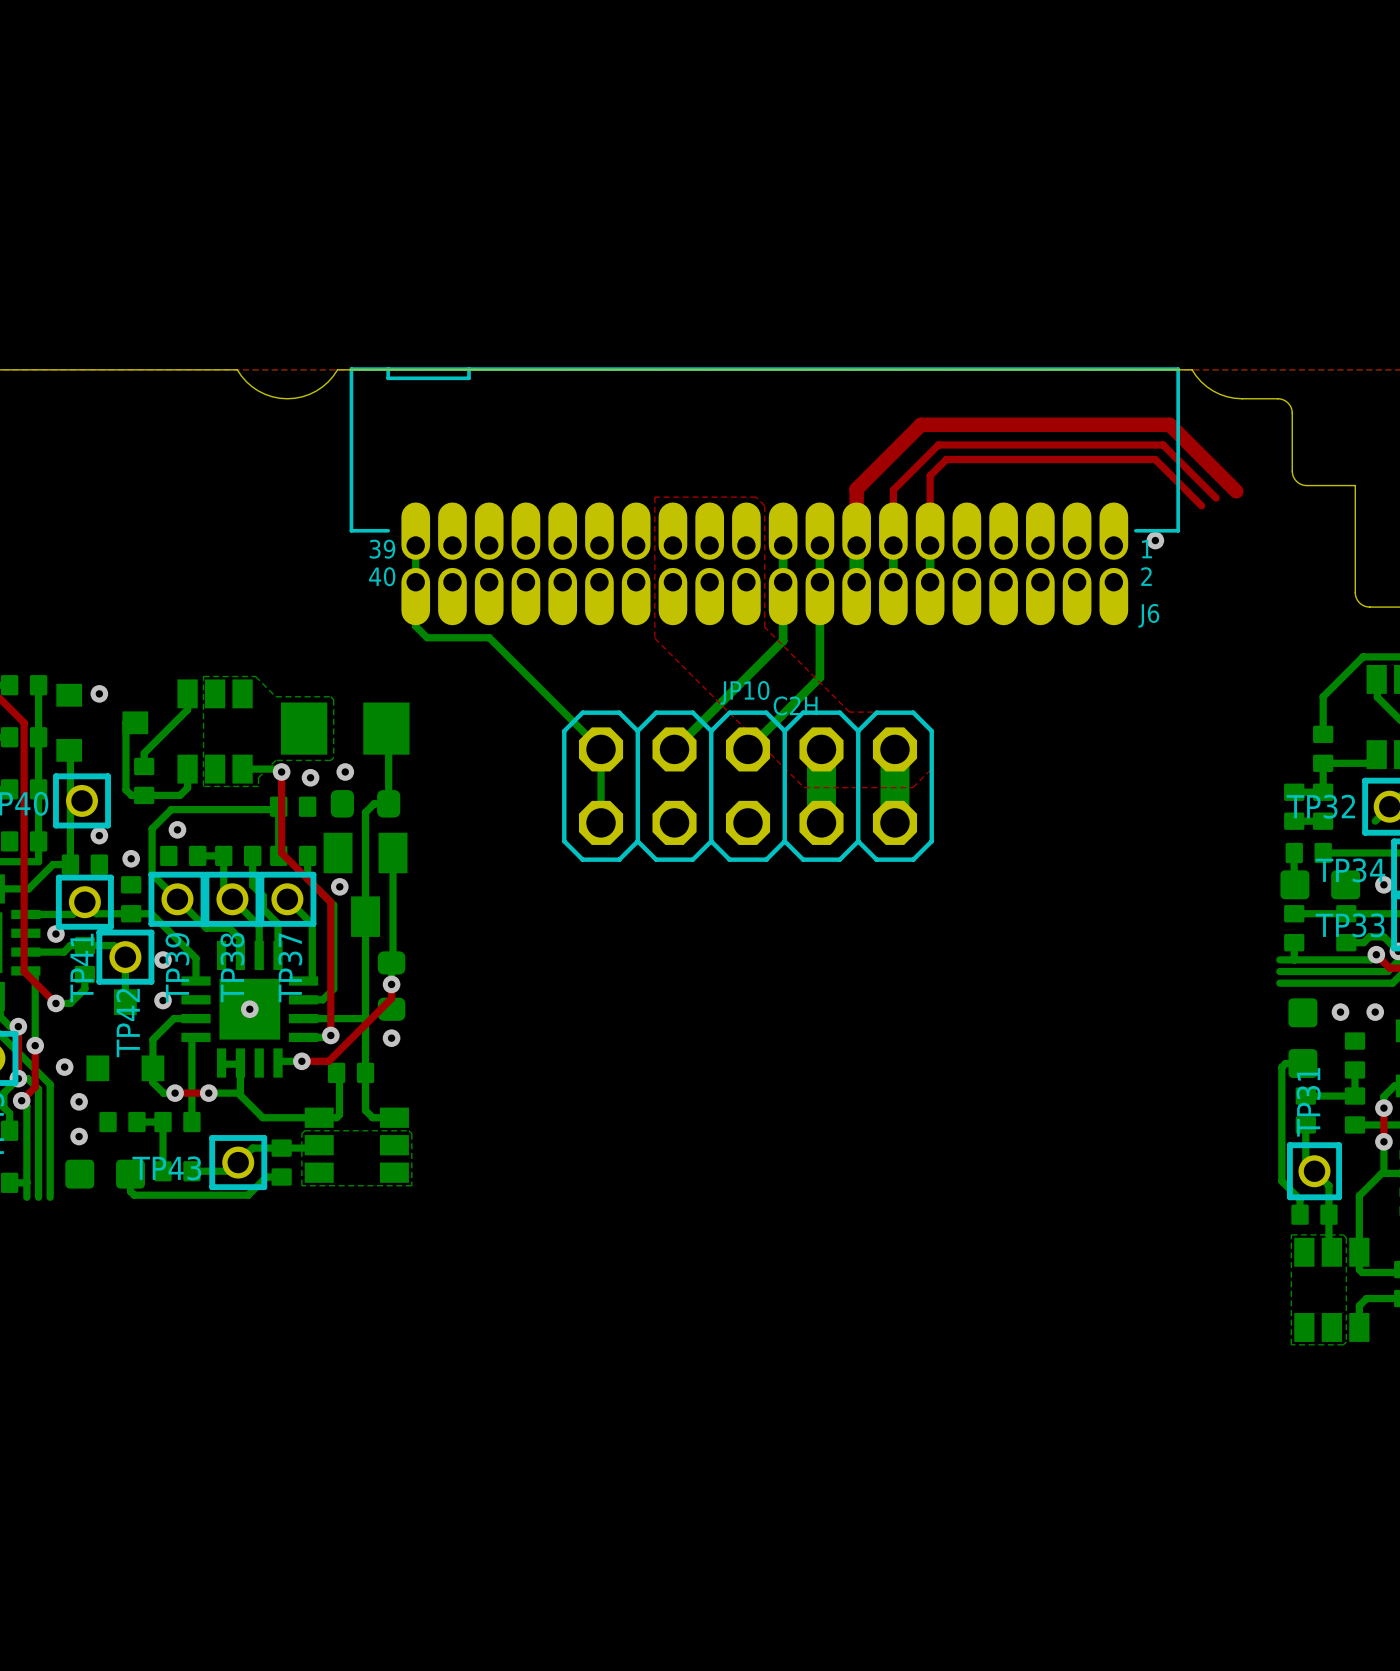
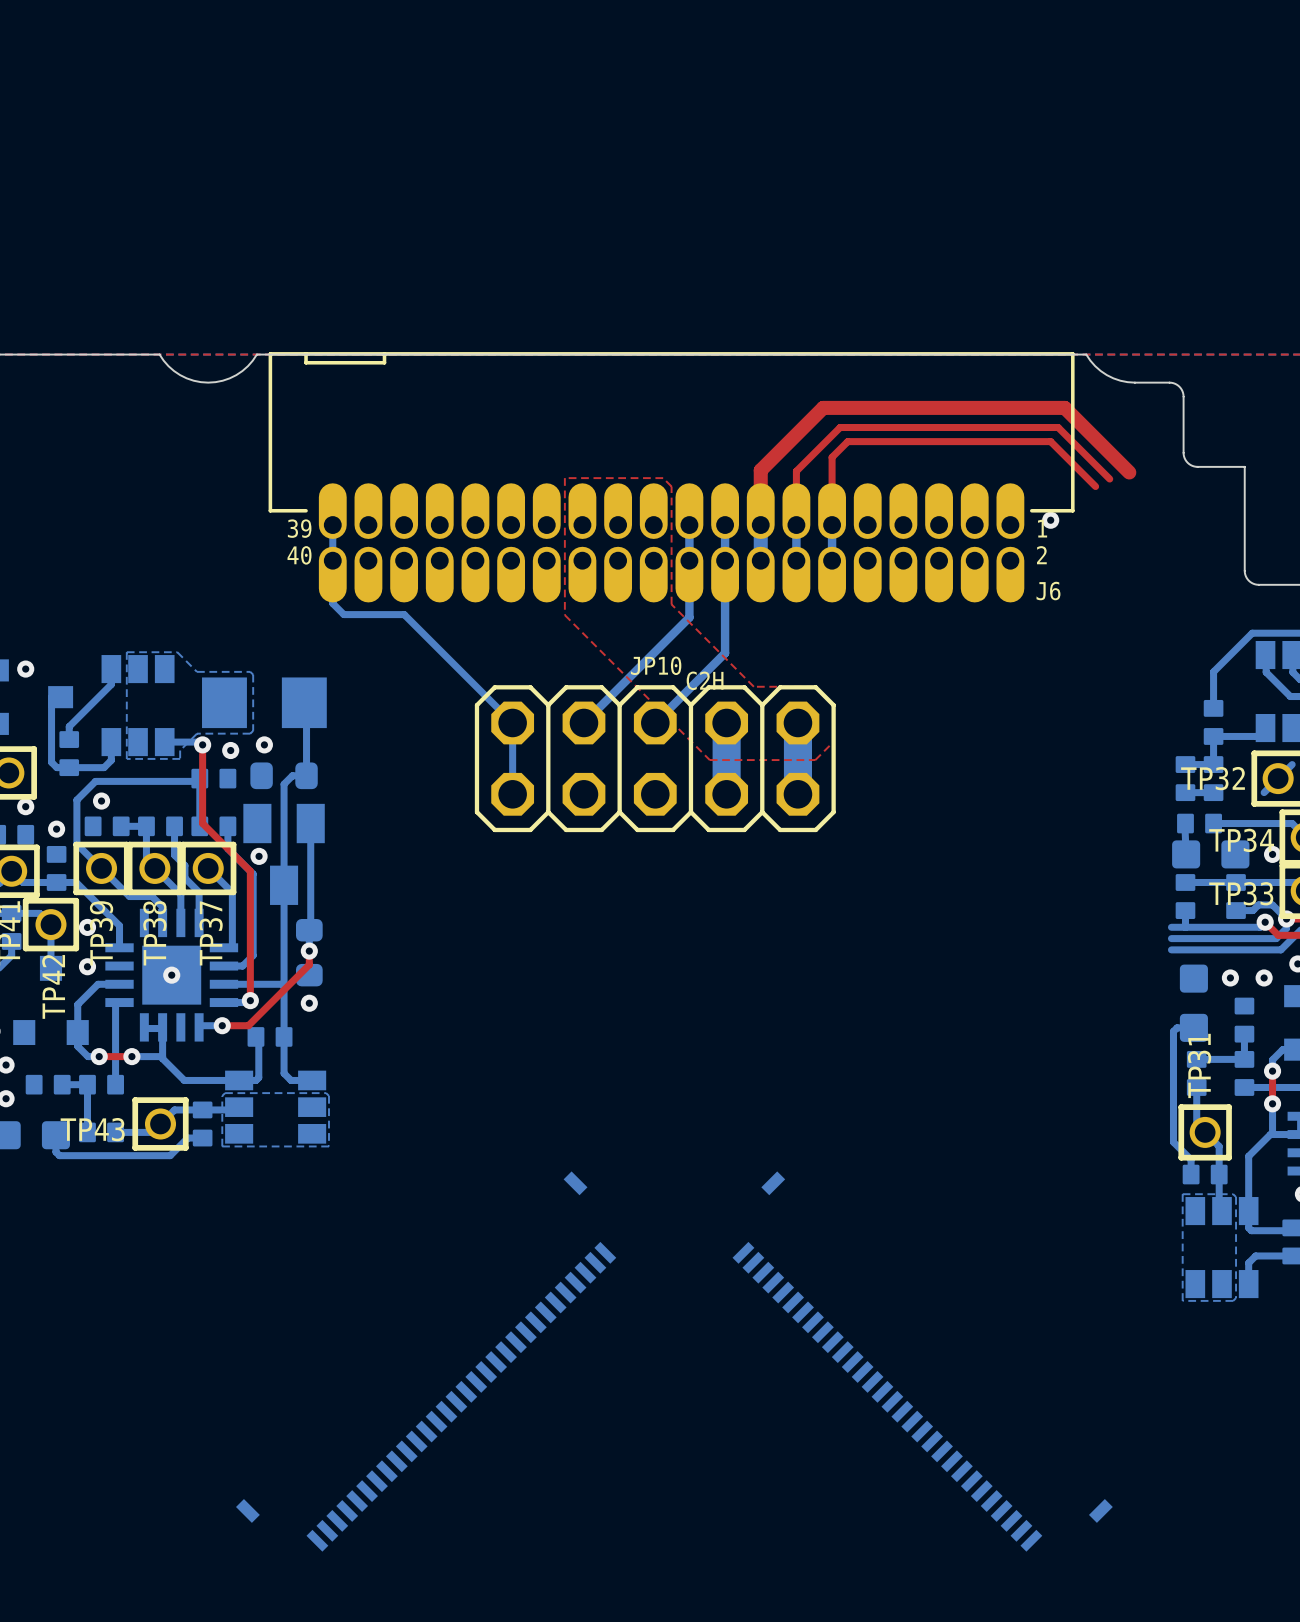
part: none -> (426, 1361)
part: none -> (922, 1361)

